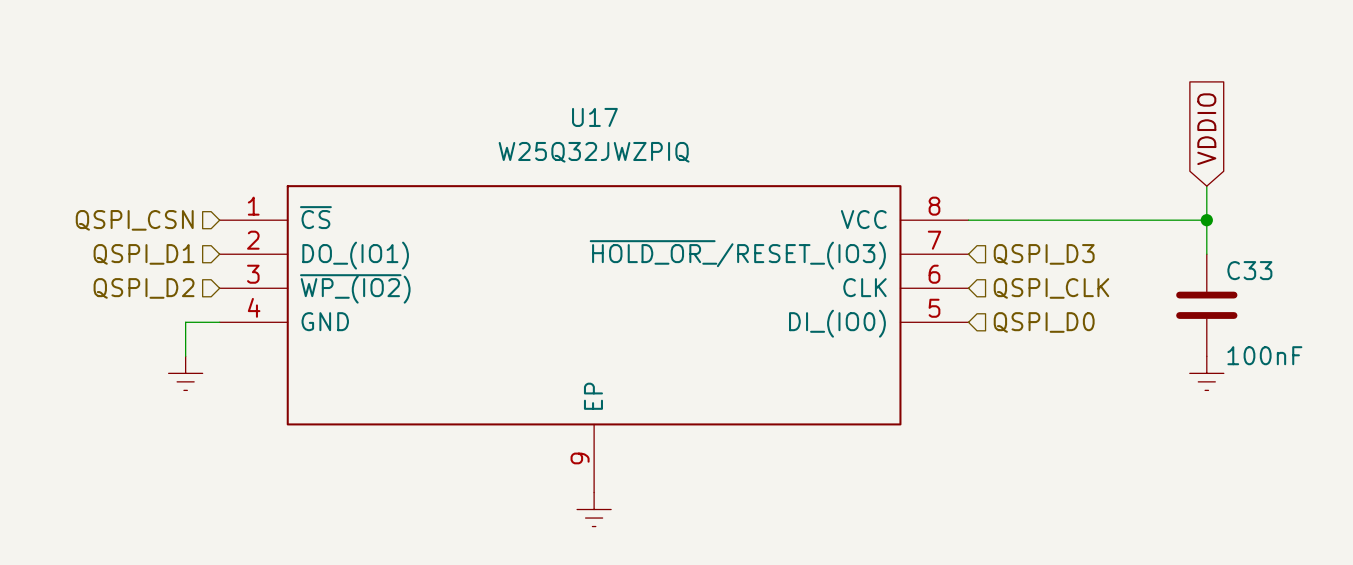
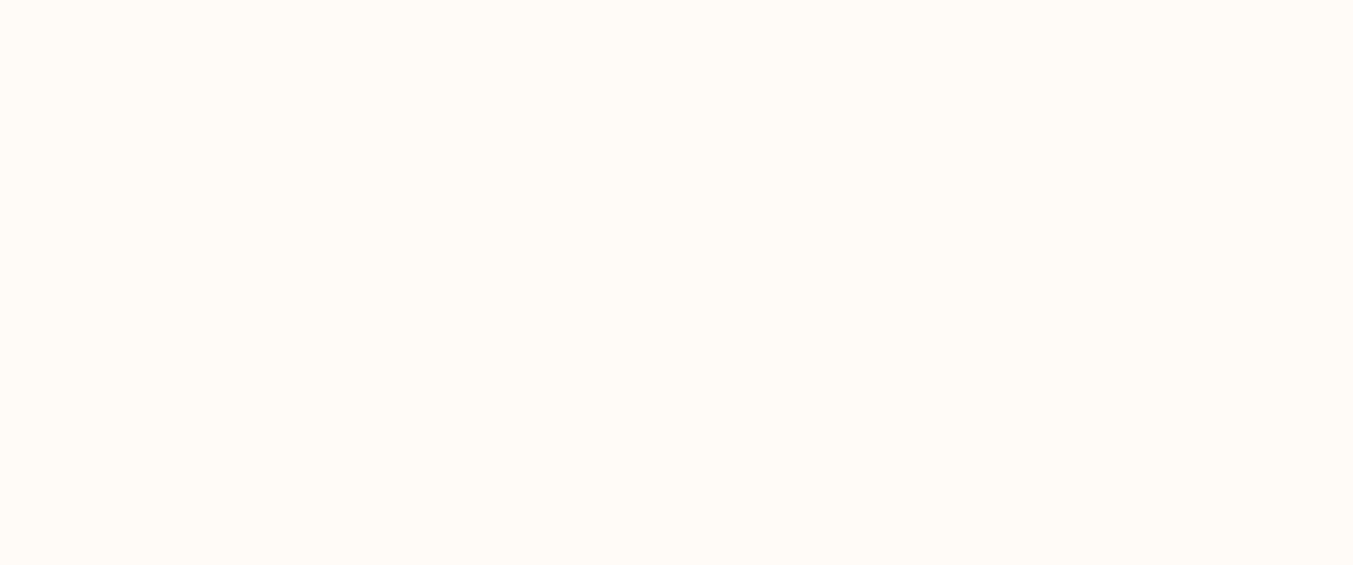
global label: VDDIO (1206, 129) -> none
wire: (1206, 186) (1206, 254) -> none
hierarchical label: QSPI_CSN (134, 220) -> none
wire: (968, 220) (1206, 220) -> none
junction: (1206, 220) -> none
hierarchical label: QSPI_D1 (144, 254) -> none
hierarchical label: QSPI_D3 (1044, 254) -> none
hierarchical label: QSPI_D2 (144, 288) -> none
hierarchical label: QSPI_CLK (1051, 288) -> none
C33: 100nF (1206, 305) -> none
wire: (219, 322) (185, 322) (185, 356) -> none
hierarchical label: QSPI_D0 (1044, 322) -> none
U17: W25Q32JWZPIQ (594, 338) -> none
power symbol: (185, 373) -> none
power symbol: (1206, 373) -> none
power symbol: (594, 509) -> none

